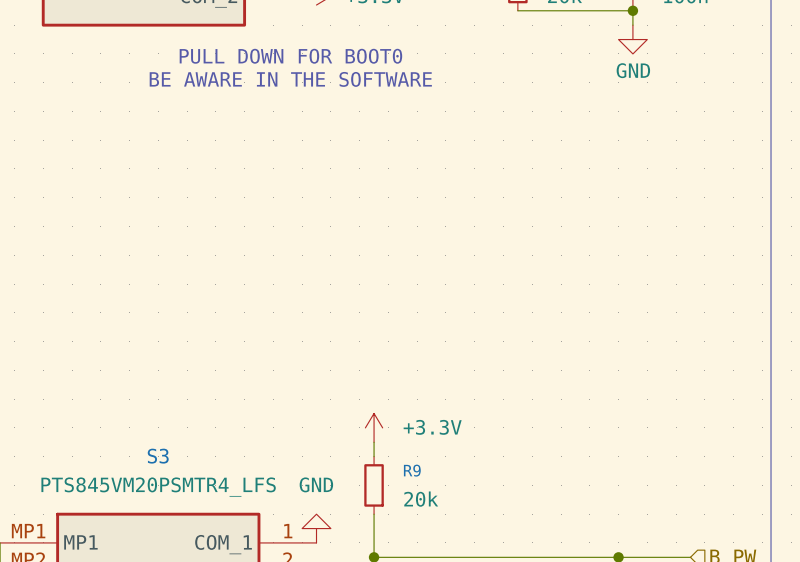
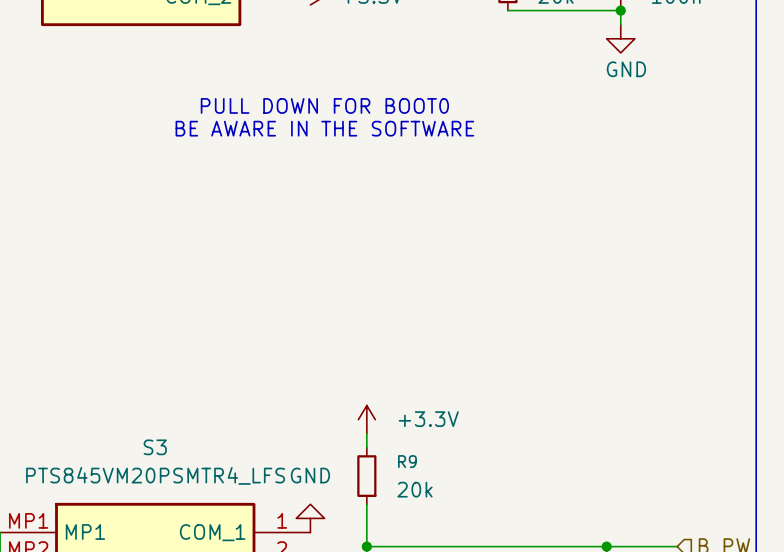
text position: PULL DOWN FOR BOOT0 (290, 56) -> PULL DOWN FOR BOOT0 (324, 105)
text position: BE AWARE IN THE SOFTWARE (290, 79) -> BE AWARE IN THE SOFTWARE (324, 128)

